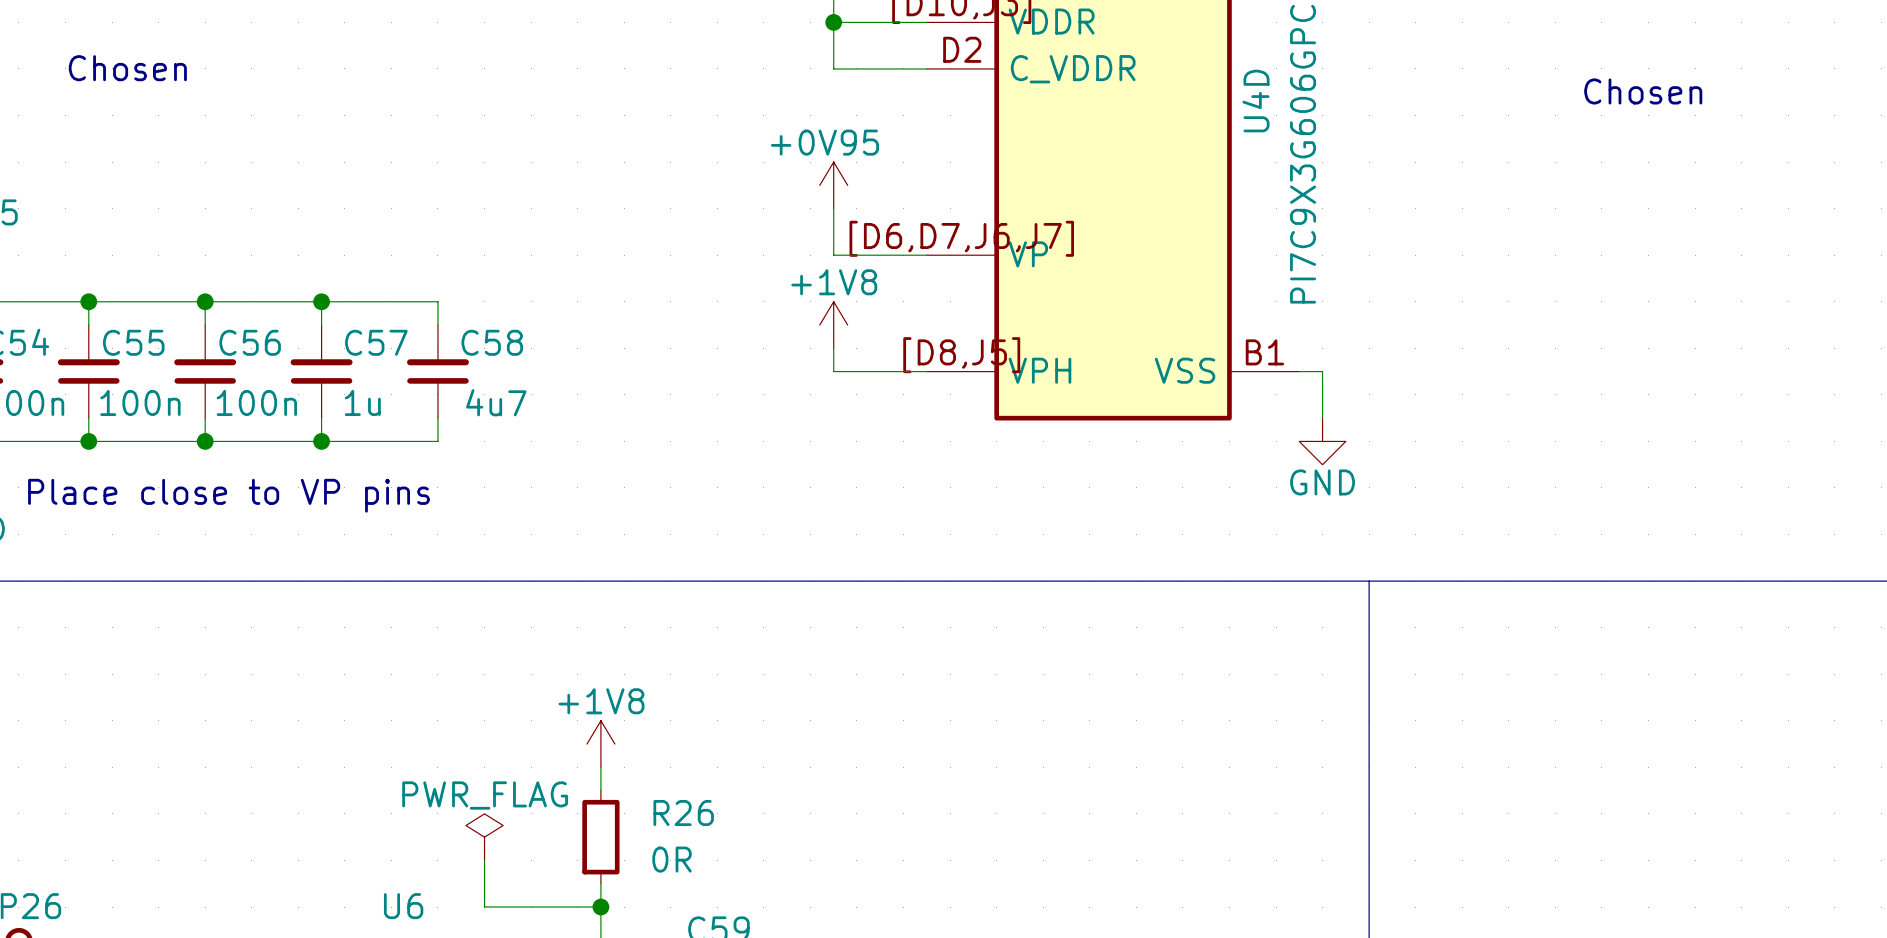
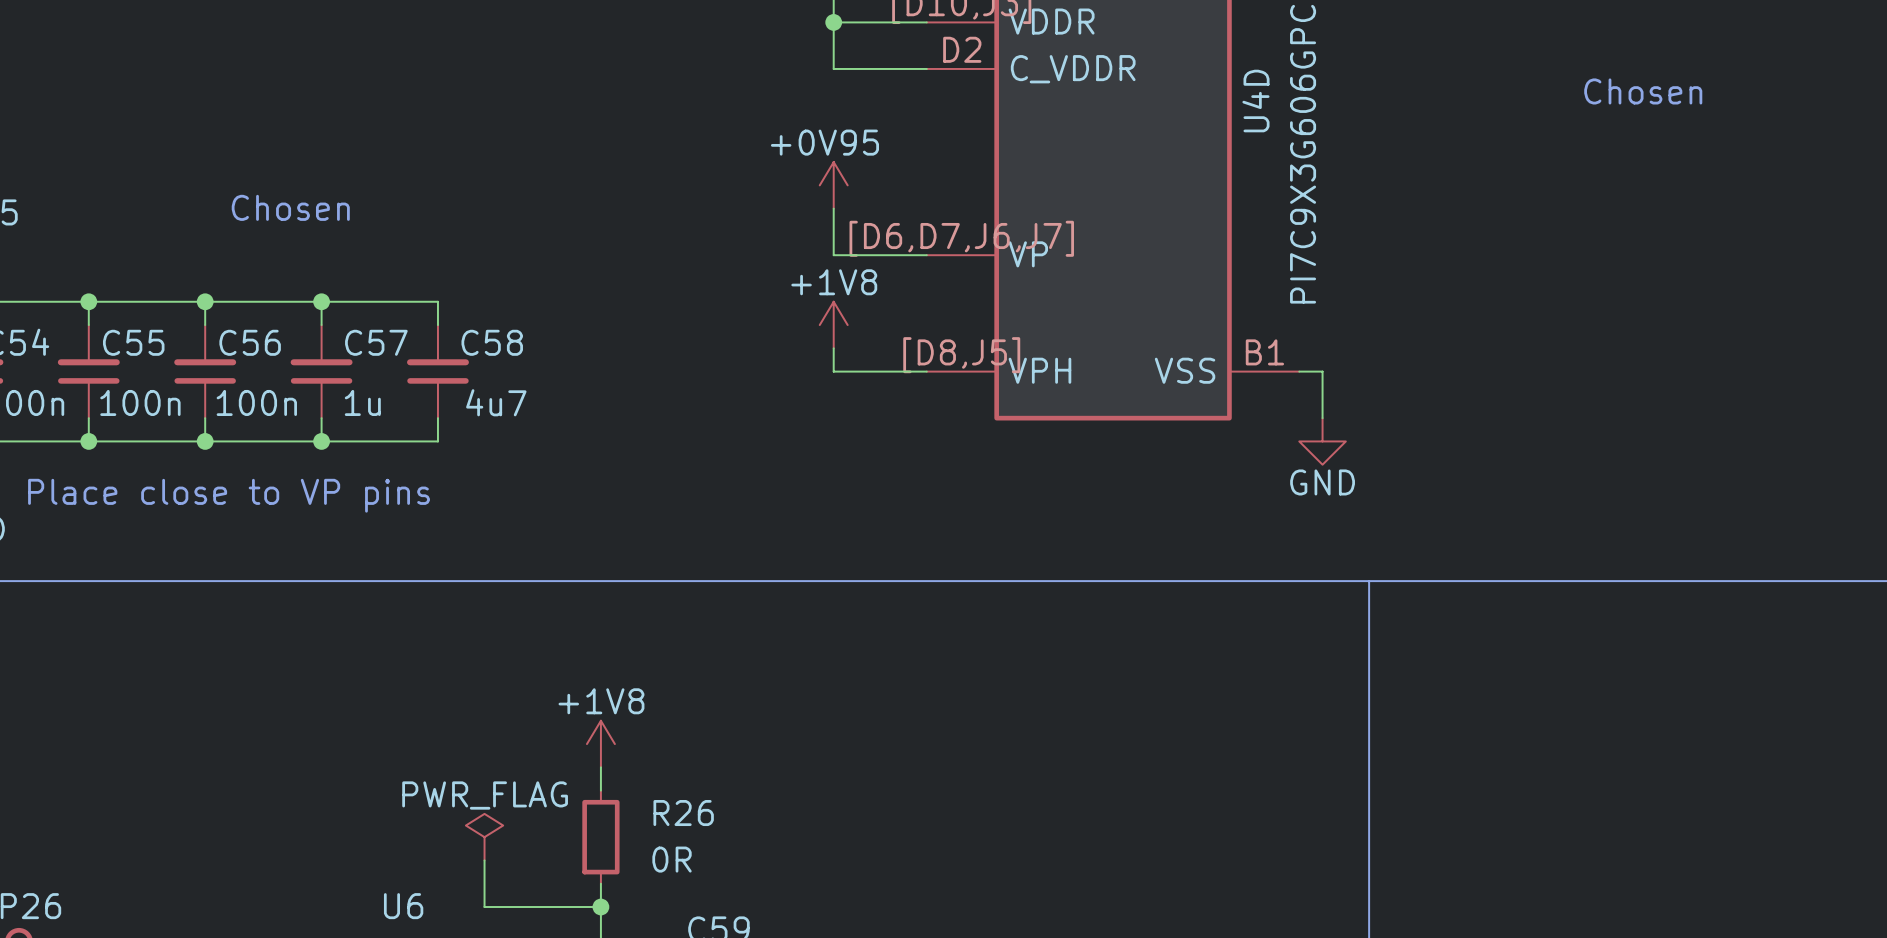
text position: Chosen (127, 68) -> Chosen (290, 207)

